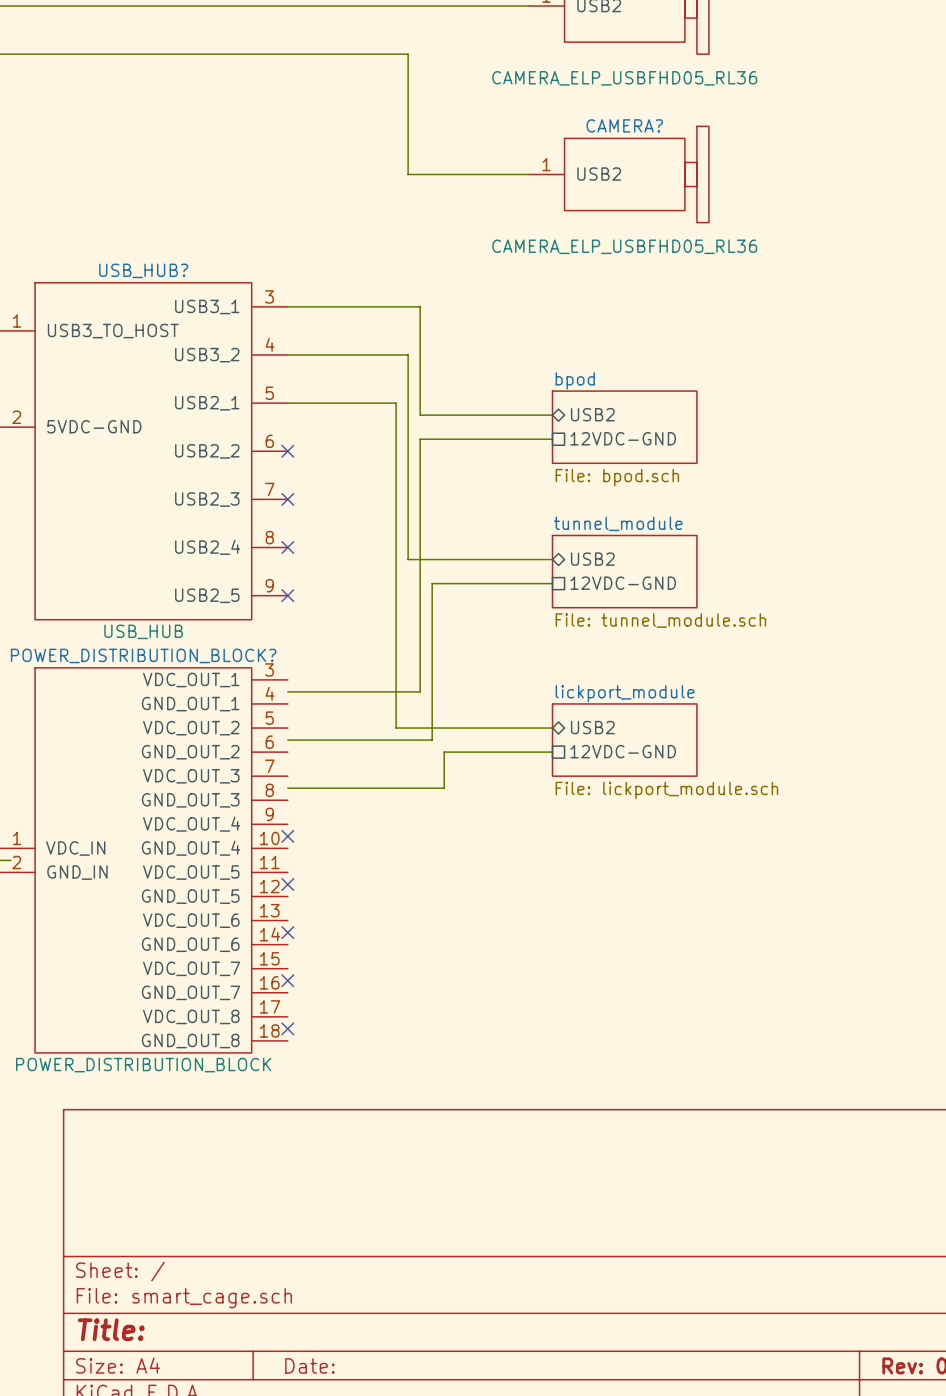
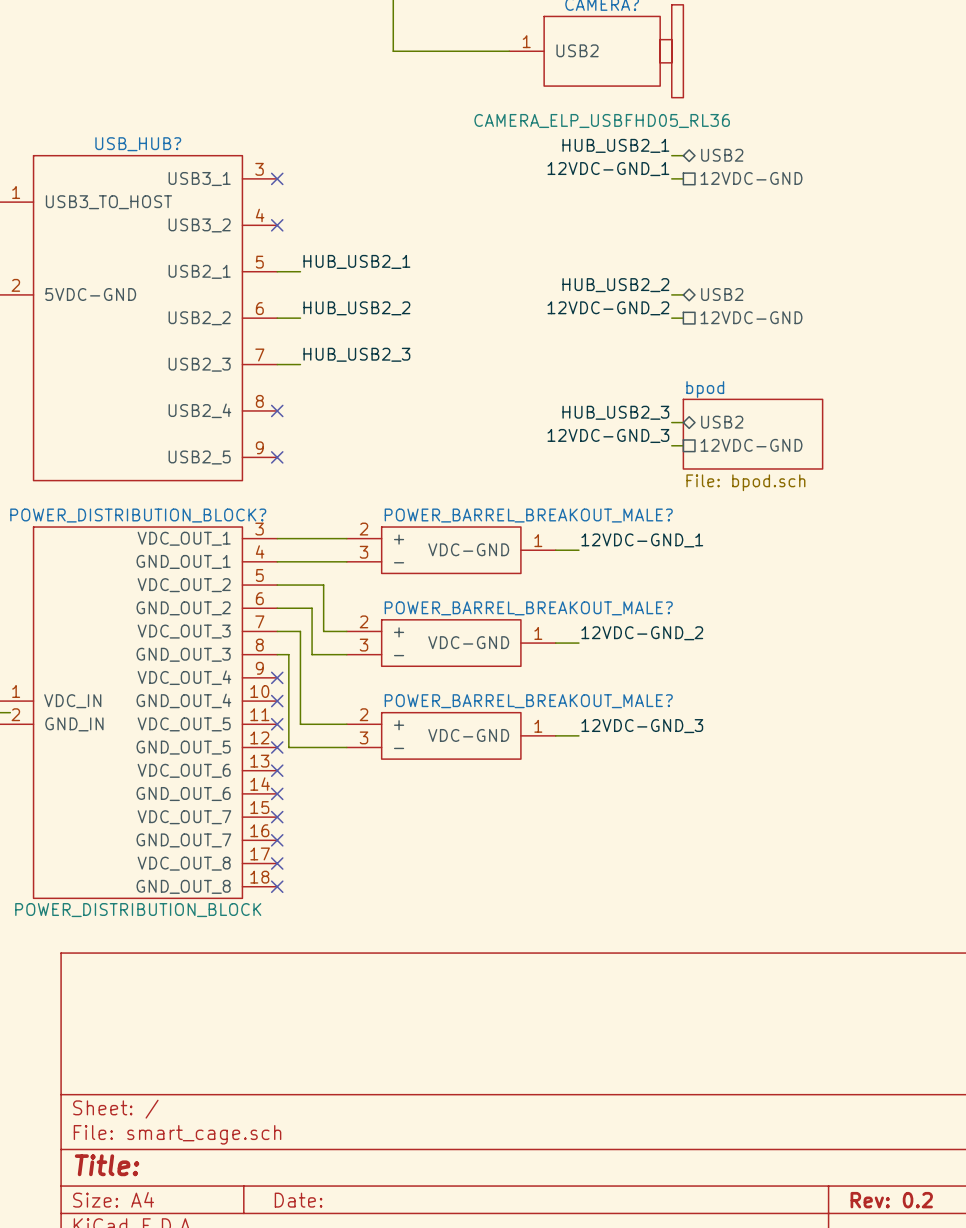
label: none -> HUB_USB2_1 (615, 145)
wire: none -> (671, 155) (683, 155)
sheet pin: none -> USB2 (722, 155)
label: none -> 12VDC-GND_1 (608, 169)
wire: (287, 306) (420, 306) (420, 415) (552, 415) -> none
no-connect mark: none -> (277, 178)
wire: none -> (671, 178) (683, 178)
sheet pin: none -> 12VDC-GND (751, 178)
wire: (287, 354) (408, 354) (408, 559) (552, 559) -> none
no-connect mark: none -> (277, 225)
label: none -> HUB_USB2_1 (356, 261)
wire: (311, 403) (396, 403) (396, 728) (552, 728) -> none
sheet pin: USB2 (592, 414) -> none
label: none -> HUB_USB2_2 (615, 285)
sheet pin: none -> USB2 (722, 294)
sheet bpod position: (624, 427) -> (753, 434)
wire: none -> (671, 294) (683, 294)
sheet pin: 12VDC-GND (623, 438) -> none
wire: (552, 439) (420, 439) (420, 691) (287, 691) -> none
label: none -> HUB_USB2_2 (356, 308)
label: none -> 12VDC-GND_2 (608, 308)
sheet pin: none -> 12VDC-GND (751, 317)
wire: none -> (277, 318) (300, 318)
no-connect mark: (287, 451) -> none
wire: none -> (671, 318) (683, 318)
label: none -> HUB_USB2_3 (356, 354)
wire: none -> (277, 364) (300, 364)
no-connect mark: (287, 499) -> none
label: none -> HUB_USB2_3 (615, 412)
sheet pin: USB2 (592, 559) -> none
wire: none -> (671, 422) (683, 422)
sheet pin: none -> USB2 (722, 422)
sheet tunnel_module: File: tunnel_module.sch (624, 571) -> none
label: none -> 12VDC-GND_3 (608, 435)
wire: (552, 583) (432, 583) (432, 740) (287, 740) -> none
sheet pin: 12VDC-GND (623, 583) -> none
wire: none -> (671, 445) (683, 445)
sheet pin: none -> 12VDC-GND (751, 445)
USB_HUB? value: USB_HUB (143, 631) -> none
wire: none -> (277, 538) (346, 538)
label: none -> 12VDC-GND_1 (642, 540)
POWER_BARREL_BREAKOUT_MALE?: none -> (451, 550)
wire: none -> (555, 550) (578, 550)
wire: none -> (277, 561) (346, 561)
sheet pin: USB2 (592, 727) -> none
wire: none -> (277, 585) (323, 585) (323, 631) (346, 631)
sheet lickport_module: File: lickport_module.sch (624, 740) -> none
sheet pin: 12VDC-GND (623, 751) -> none
wire: none -> (277, 608) (312, 608) (312, 654) (346, 654)
wire: (552, 752) (444, 752) (444, 788) (287, 788) -> none
wire: none -> (277, 631) (300, 631) (300, 724) (346, 724)
label: none -> 12VDC-GND_2 (642, 633)
POWER_BARREL_BREAKOUT_MALE?: none -> (451, 643)
wire: none -> (555, 643) (578, 643)
wire: none -> (277, 654) (288, 654) (288, 747) (346, 747)
no-connect mark: none -> (277, 677)
no-connect mark: (287, 836) -> none
no-connect mark: none -> (277, 701)
no-connect mark: none -> (277, 724)
label: none -> 12VDC-GND_3 (642, 726)
no-connect mark: (287, 884) -> none
POWER_BARREL_BREAKOUT_MALE?: none -> (451, 735)
wire: none -> (555, 735) (578, 735)
no-connect mark: none -> (277, 747)
no-connect mark: none -> (277, 770)
no-connect mark: (287, 932) -> none
no-connect mark: none -> (277, 793)
no-connect mark: none -> (277, 817)
no-connect mark: (287, 980) -> none
no-connect mark: none -> (277, 840)
no-connect mark: none -> (277, 863)
no-connect mark: (287, 1028) -> none
no-connect mark: none -> (277, 886)

